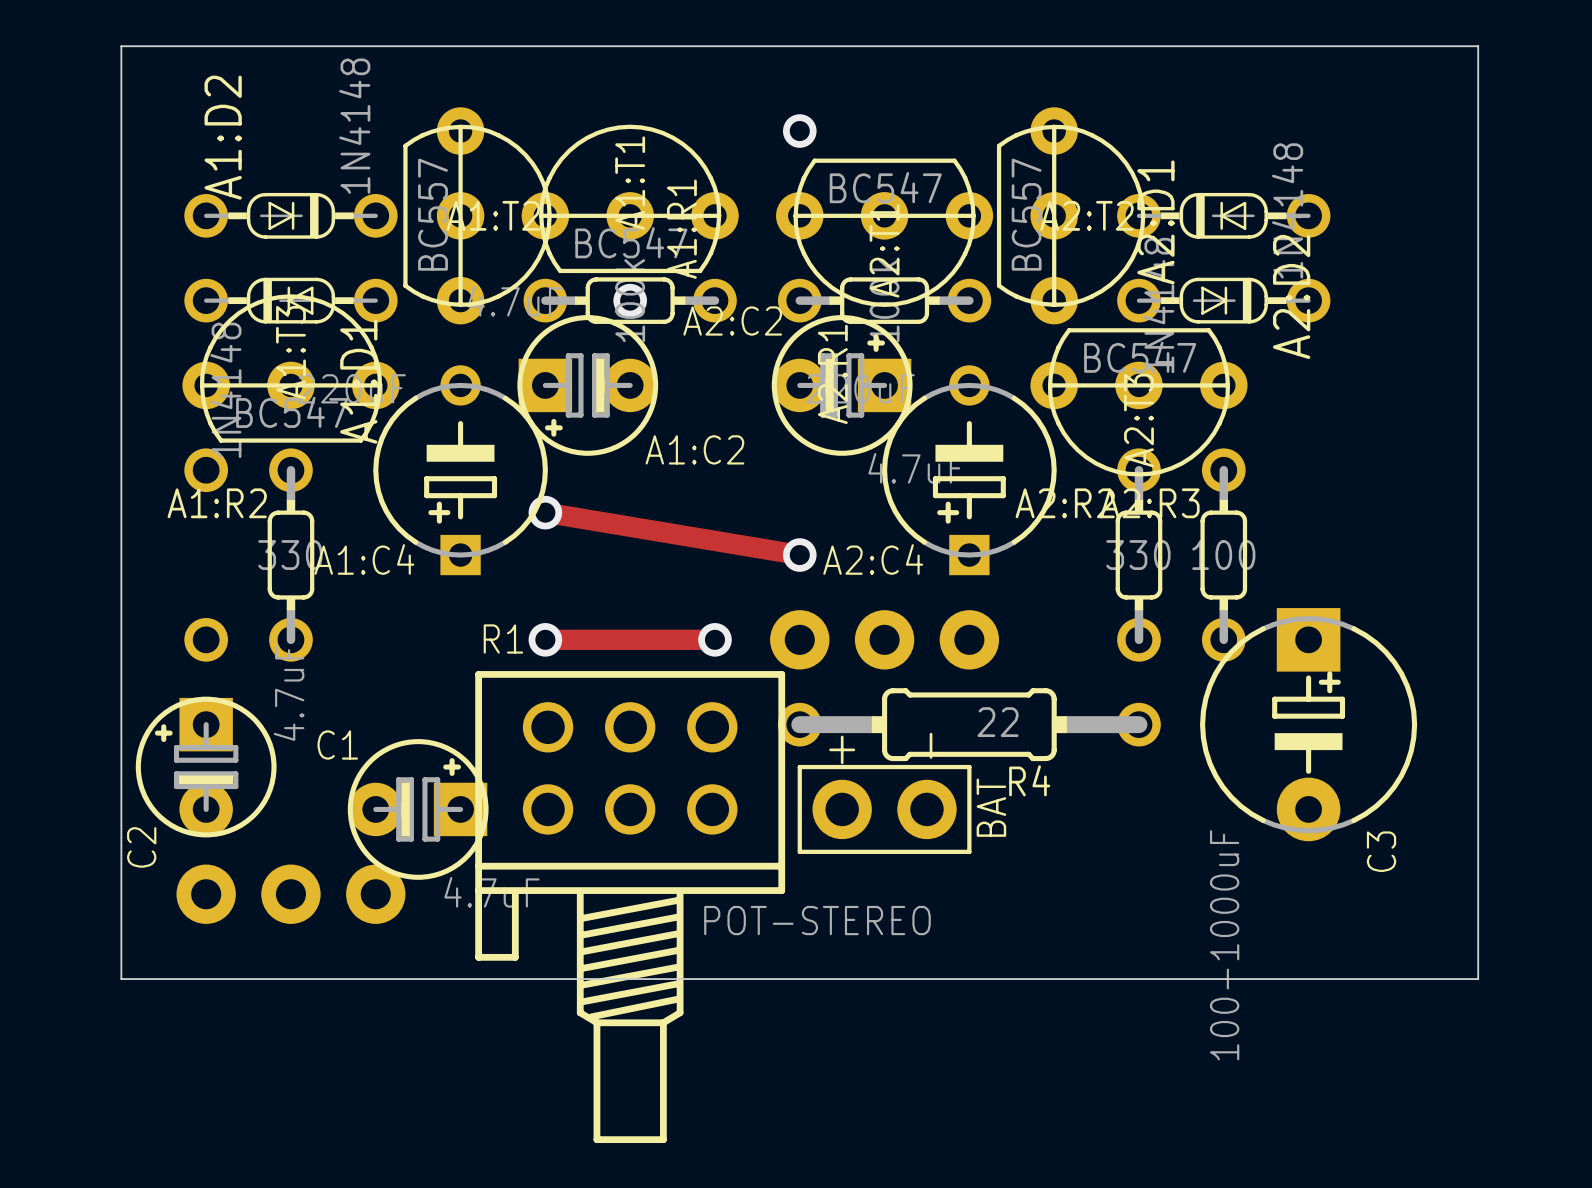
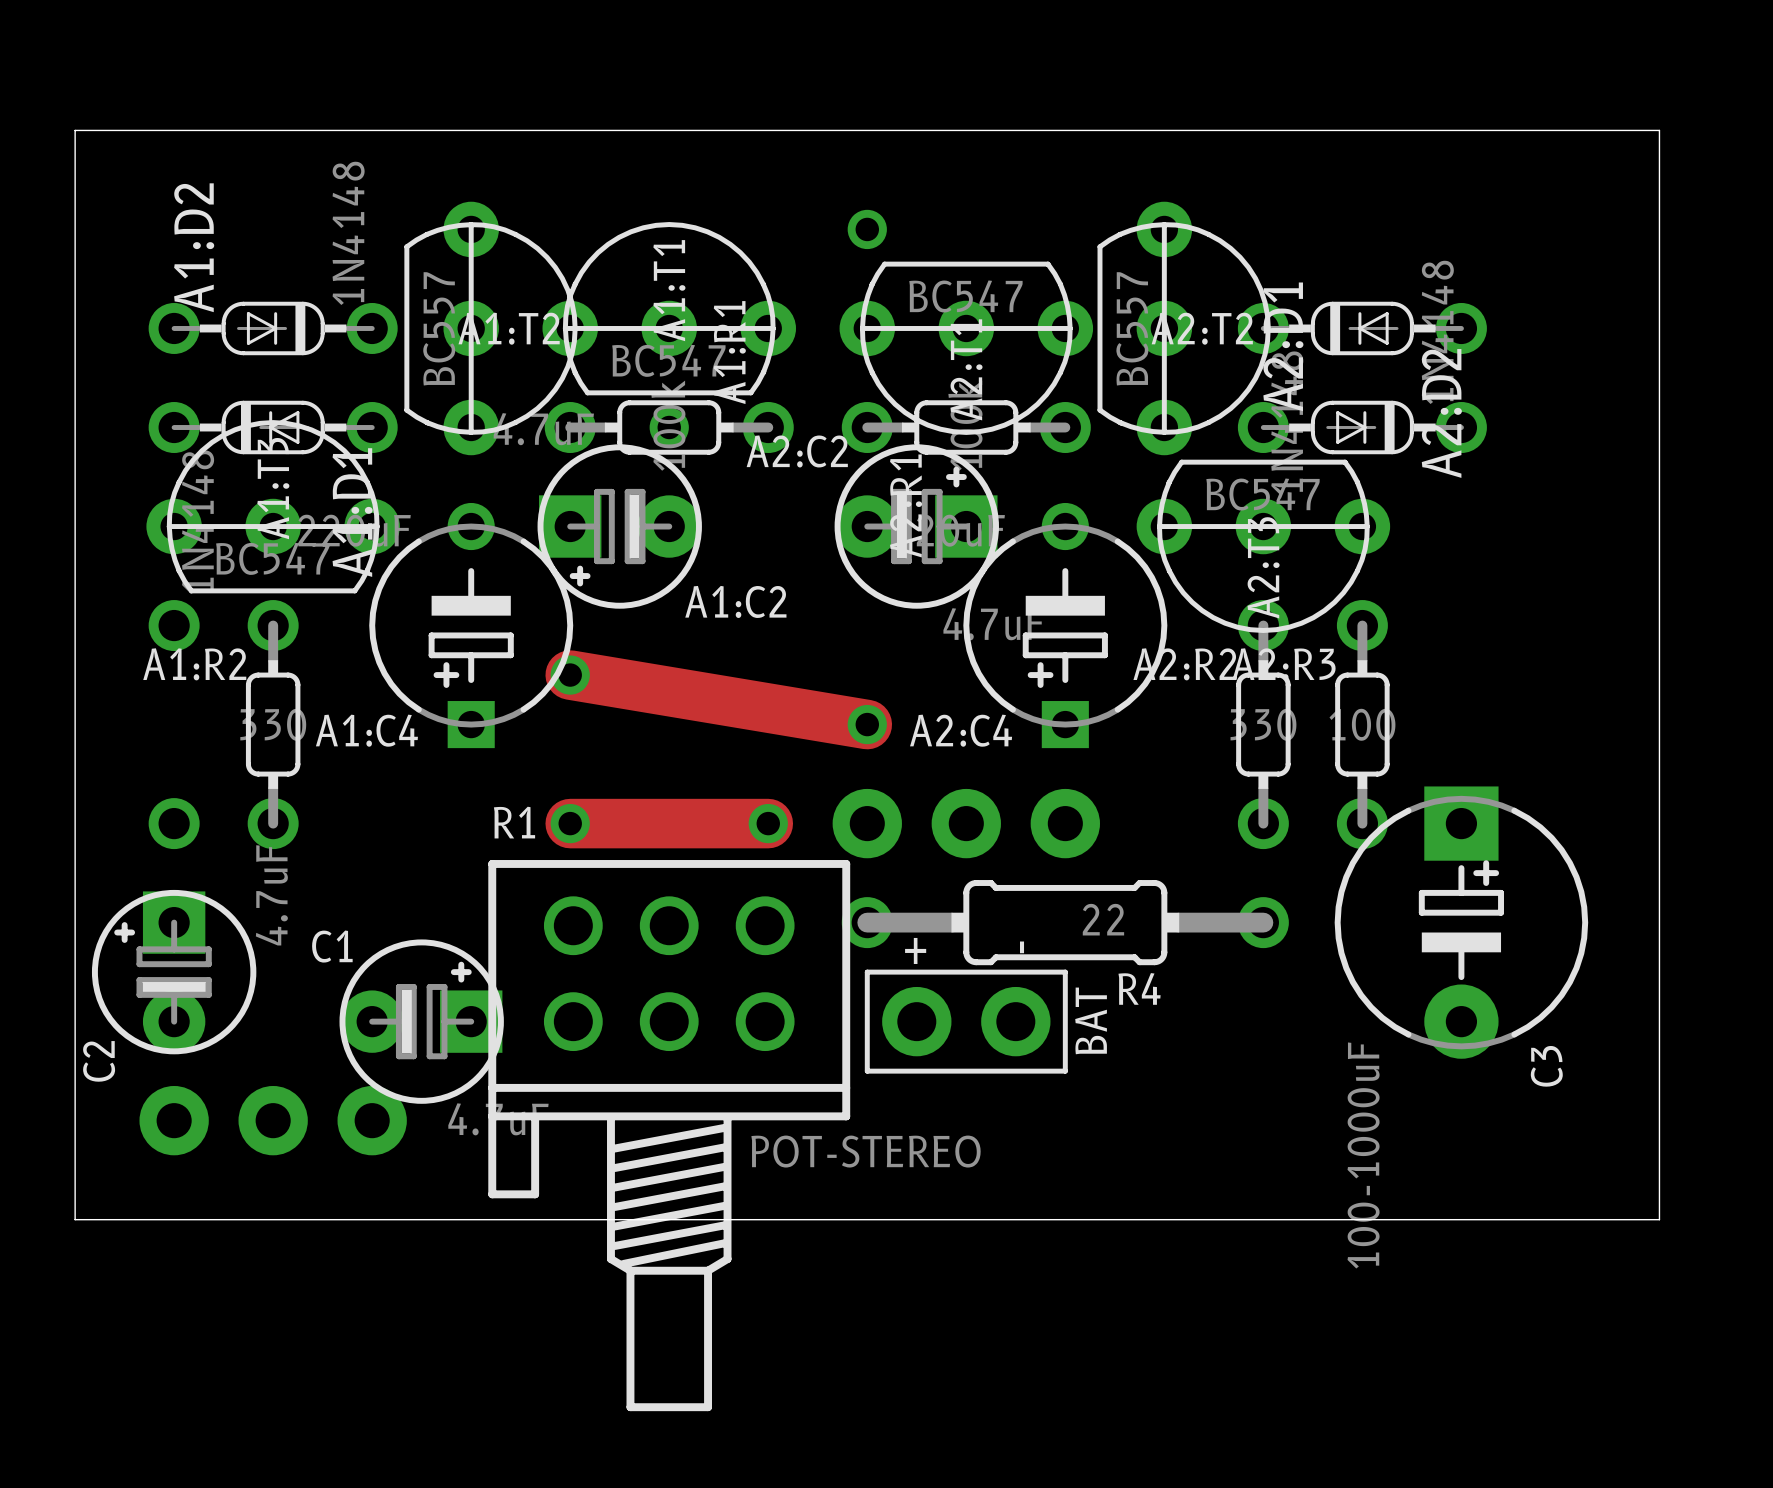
track width: thin (545, 512) (799, 555) -> thick (570, 675) (867, 724)
track width: thin (545, 639) (714, 639) -> thick (570, 823) (768, 823)

